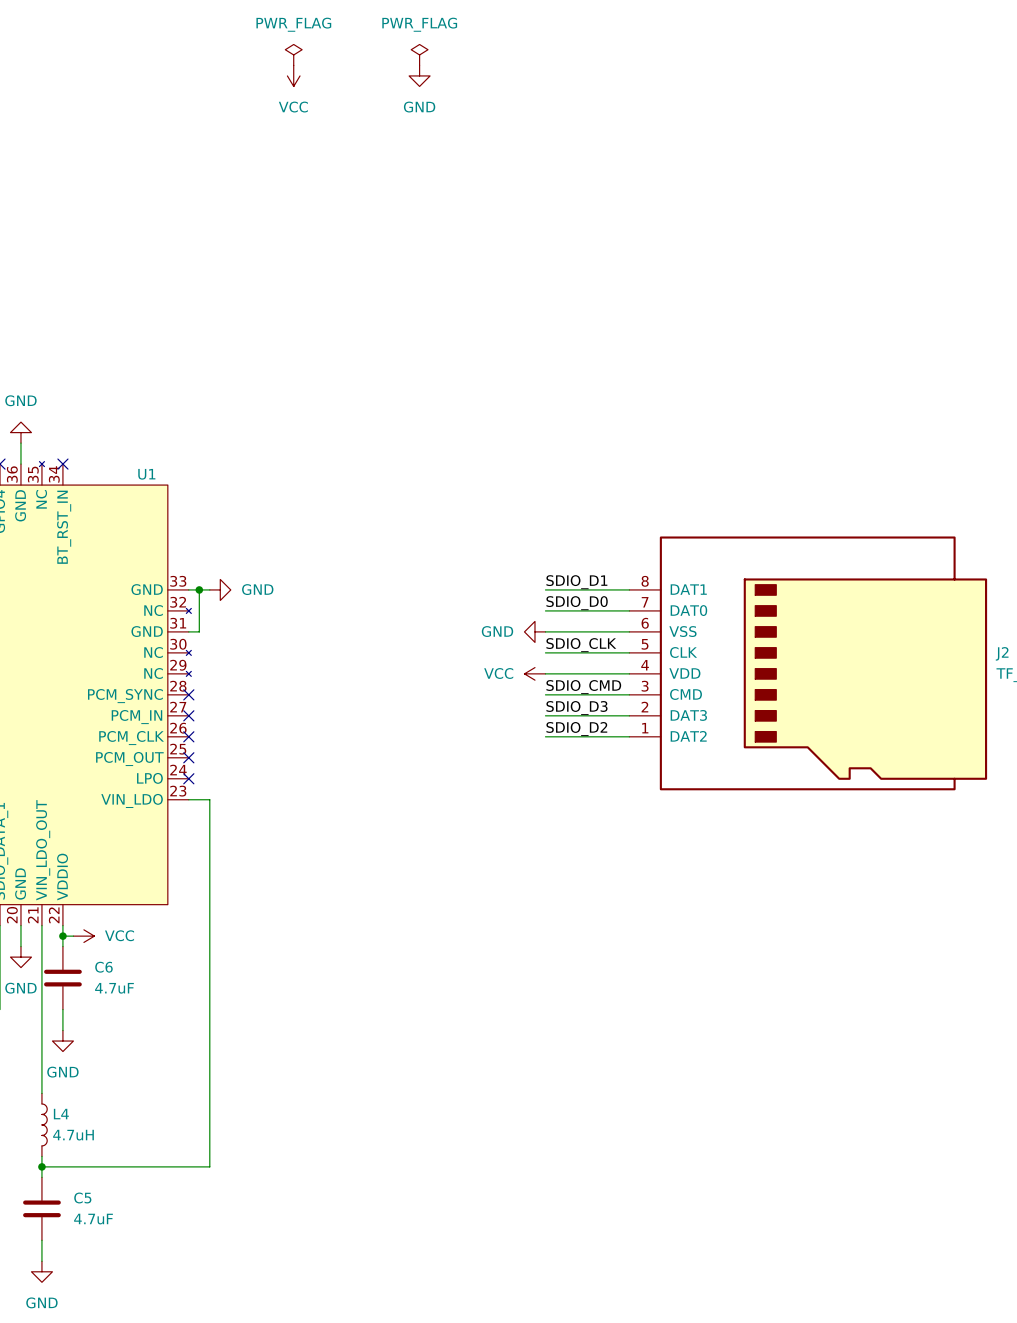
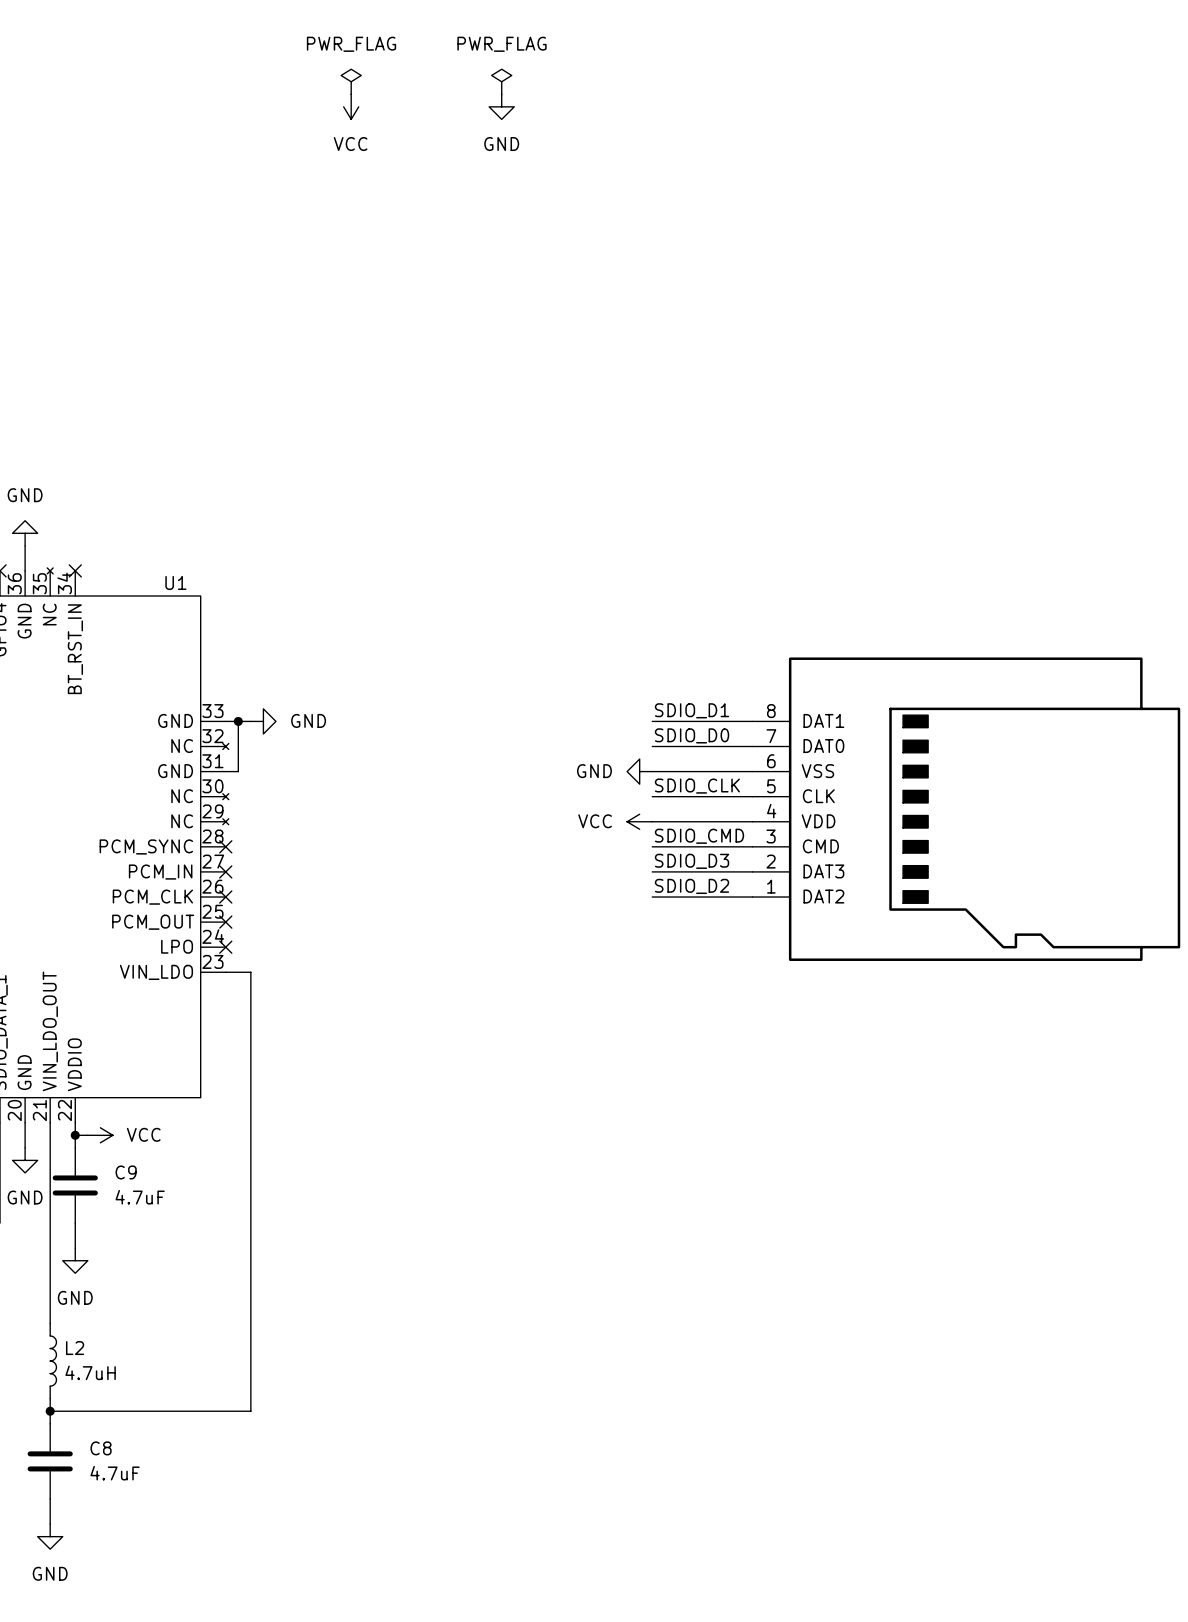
C6 name: C6 (103, 967) -> C9 (126, 1172)
L4 name: L4 (61, 1114) -> L2 (75, 1348)
C5 name: C5 (82, 1197) -> C8 (101, 1448)

